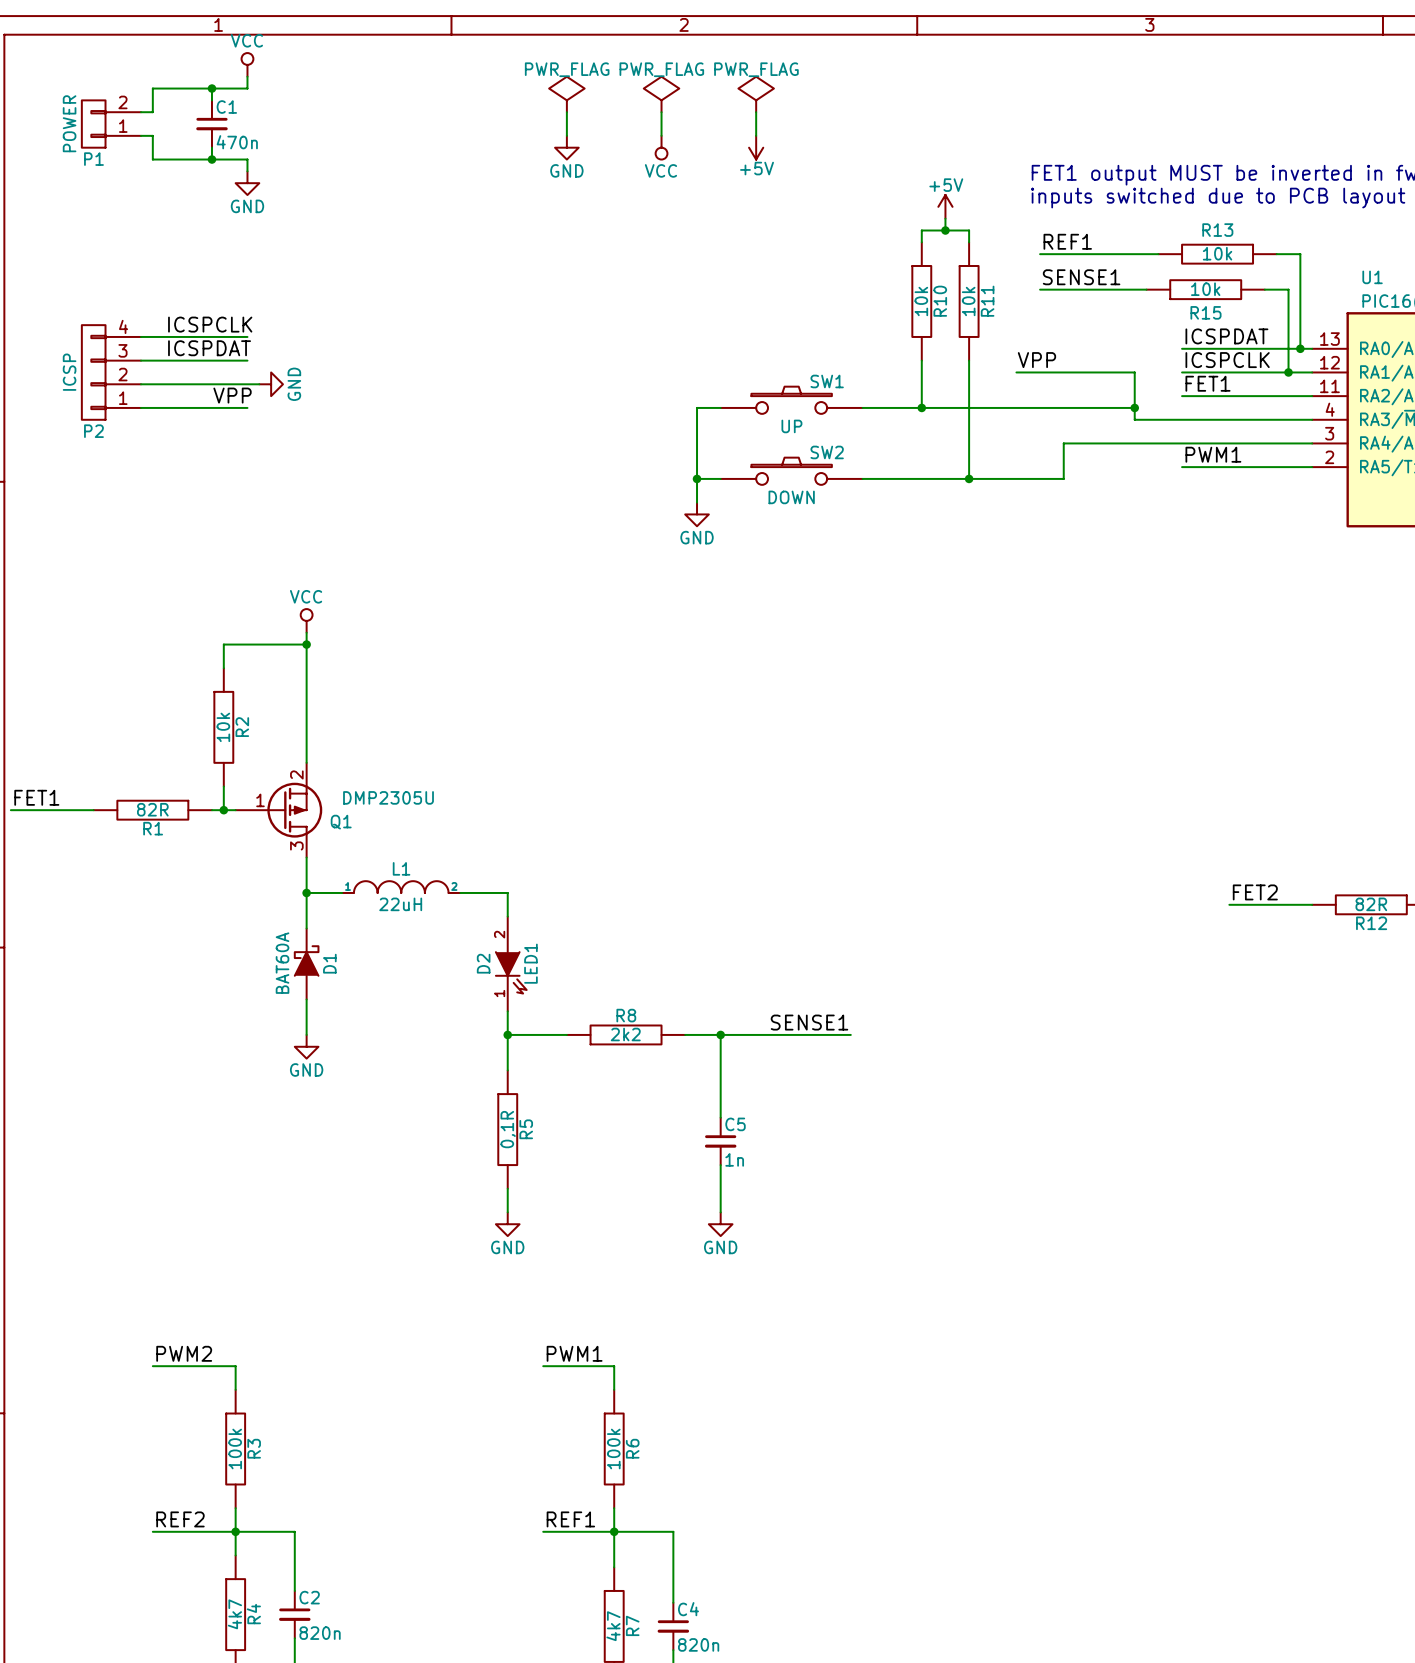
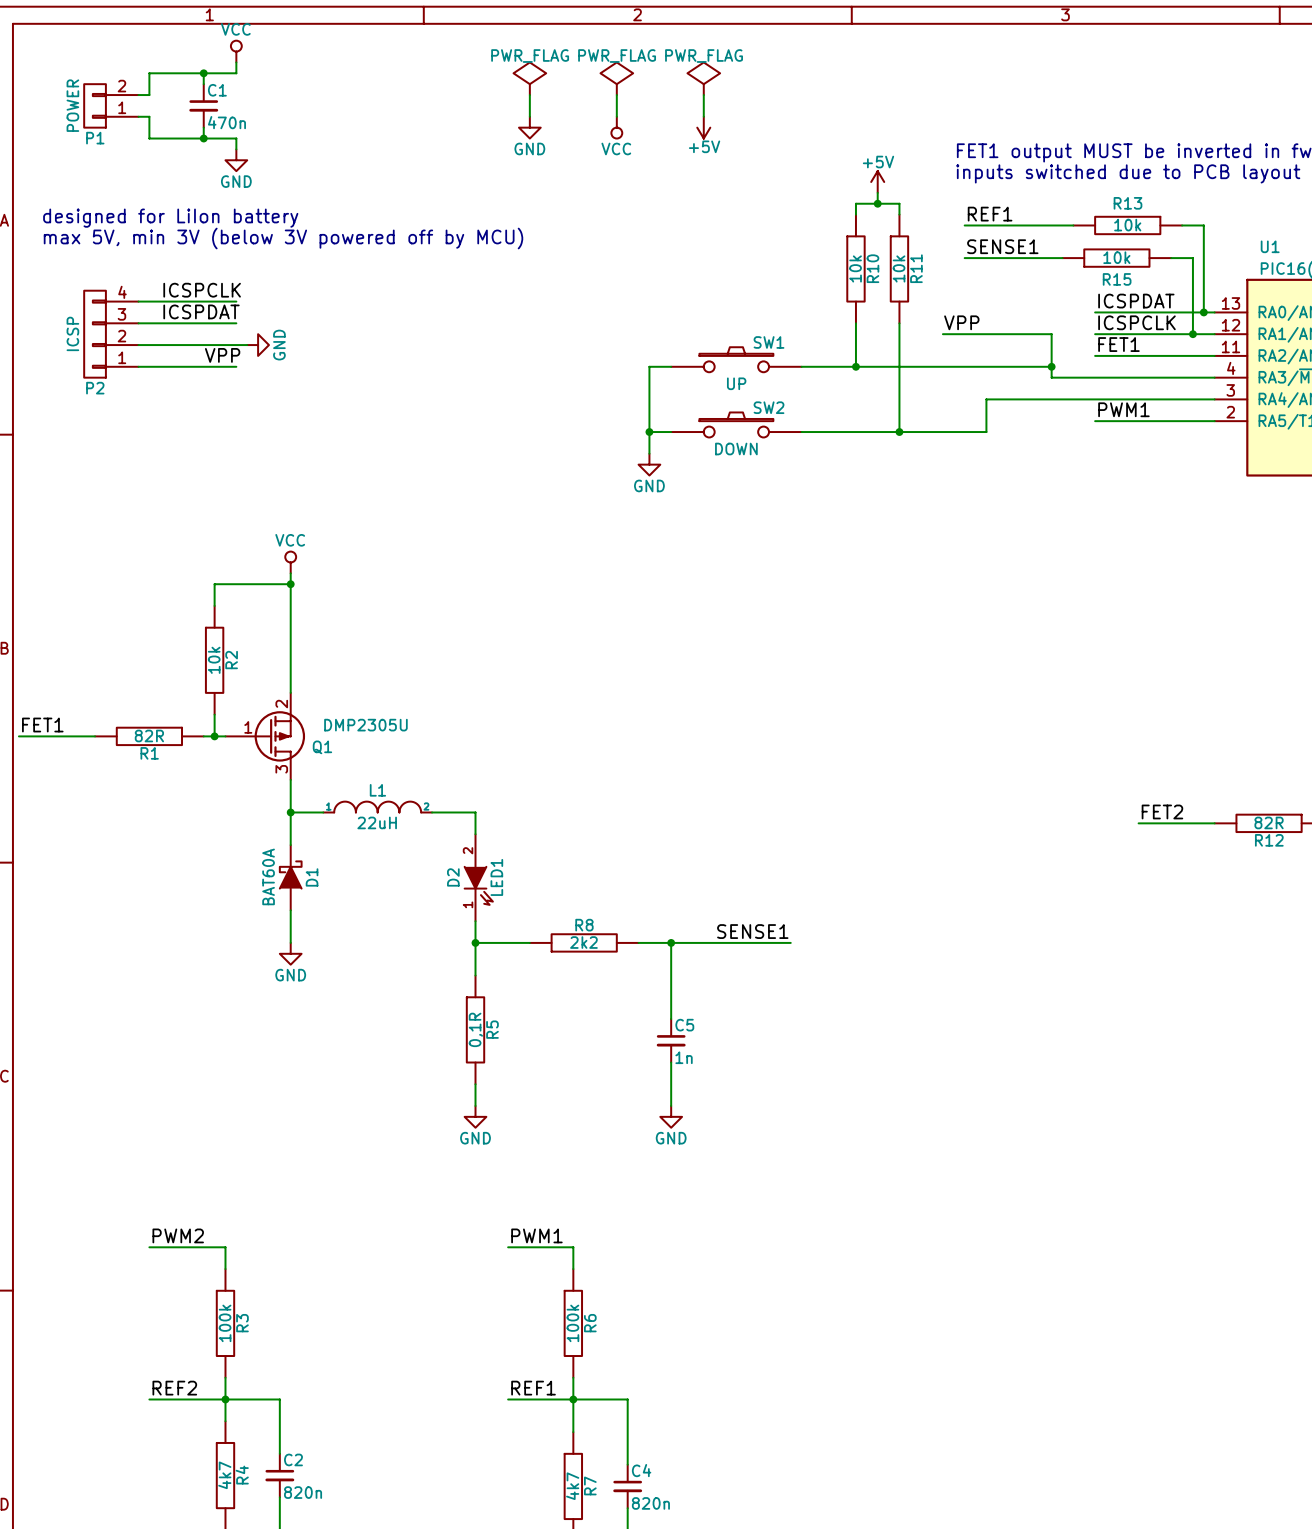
text: none -> designed for LiIon battery (170, 218)
text: none -> max 5V, min 3V (below 3V powered off by MCU) (283, 238)

